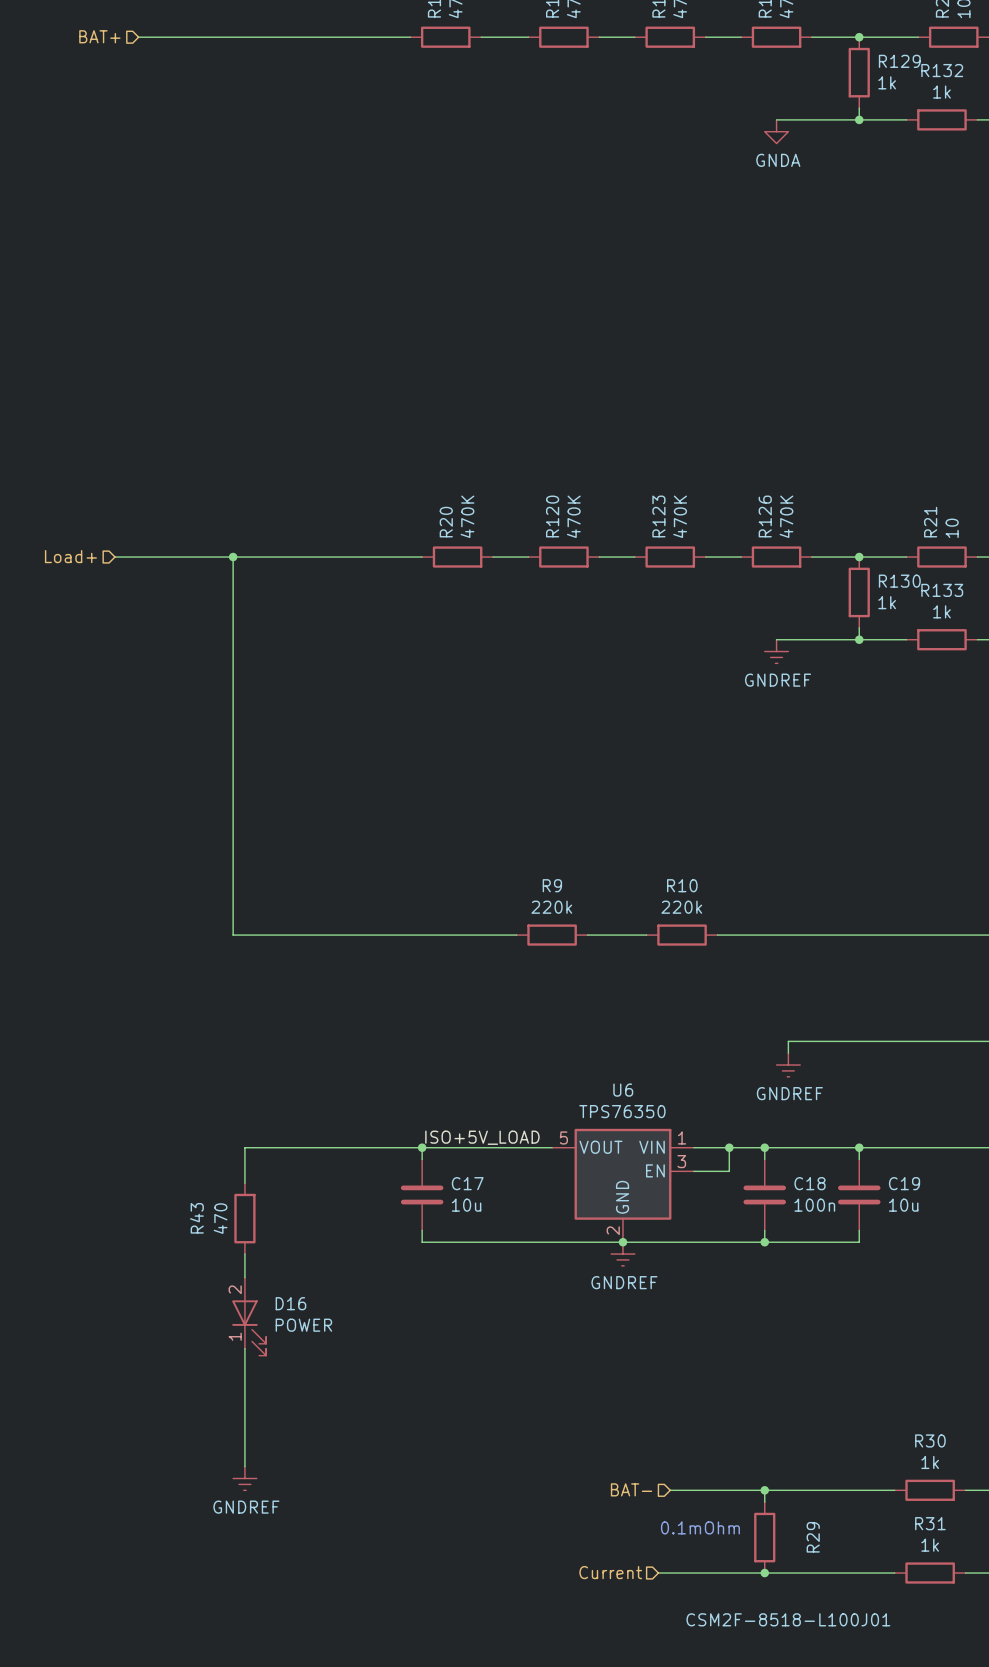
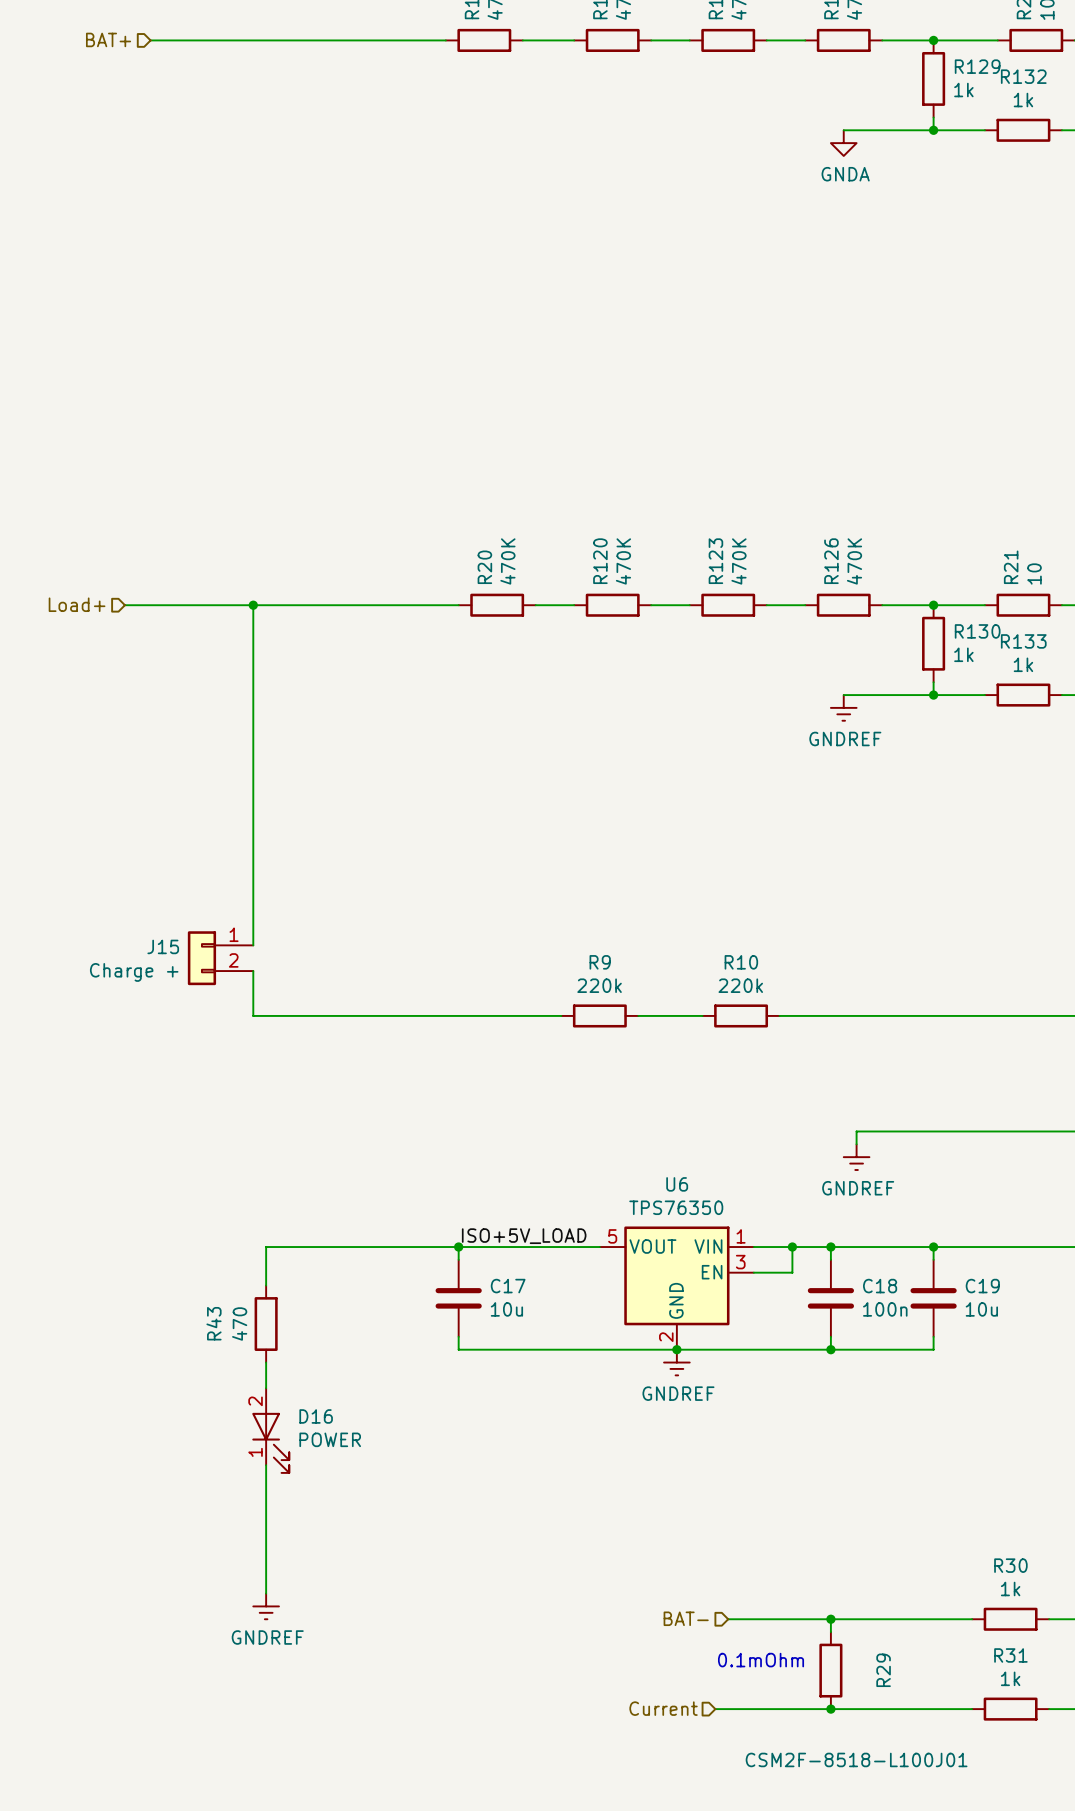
wire: (233, 870) (233, 893) -> none
J15: none -> Charge + (220, 958)

